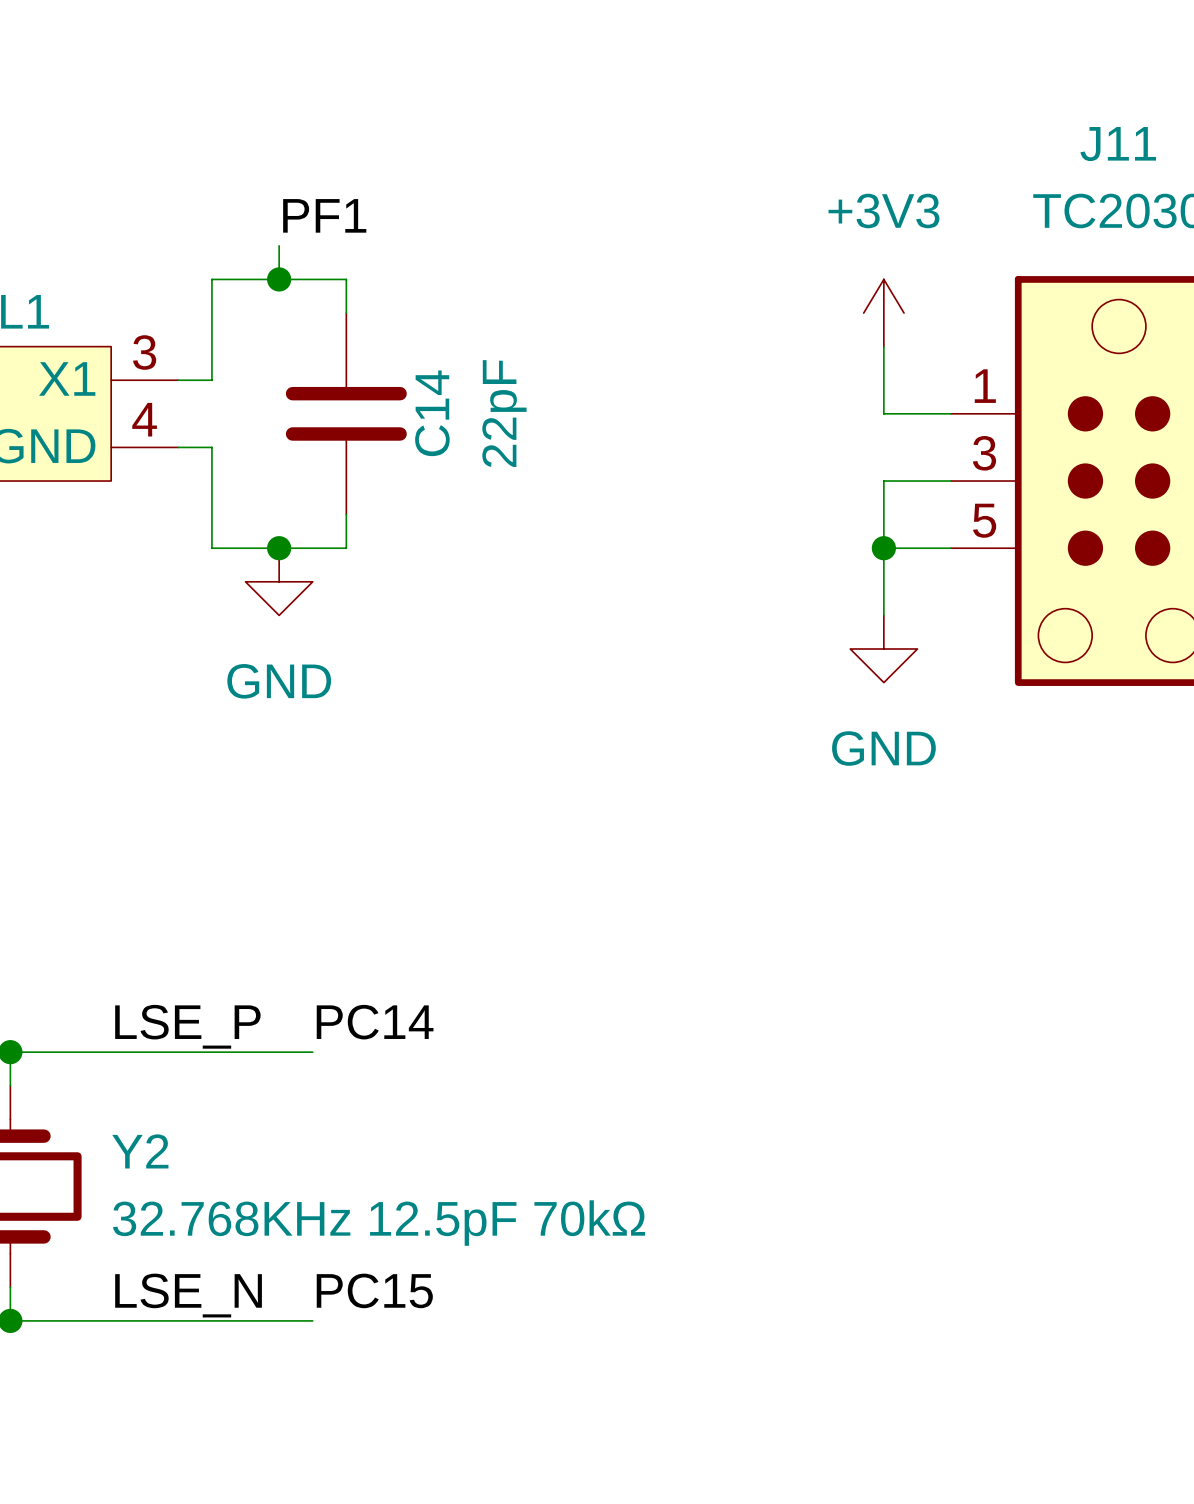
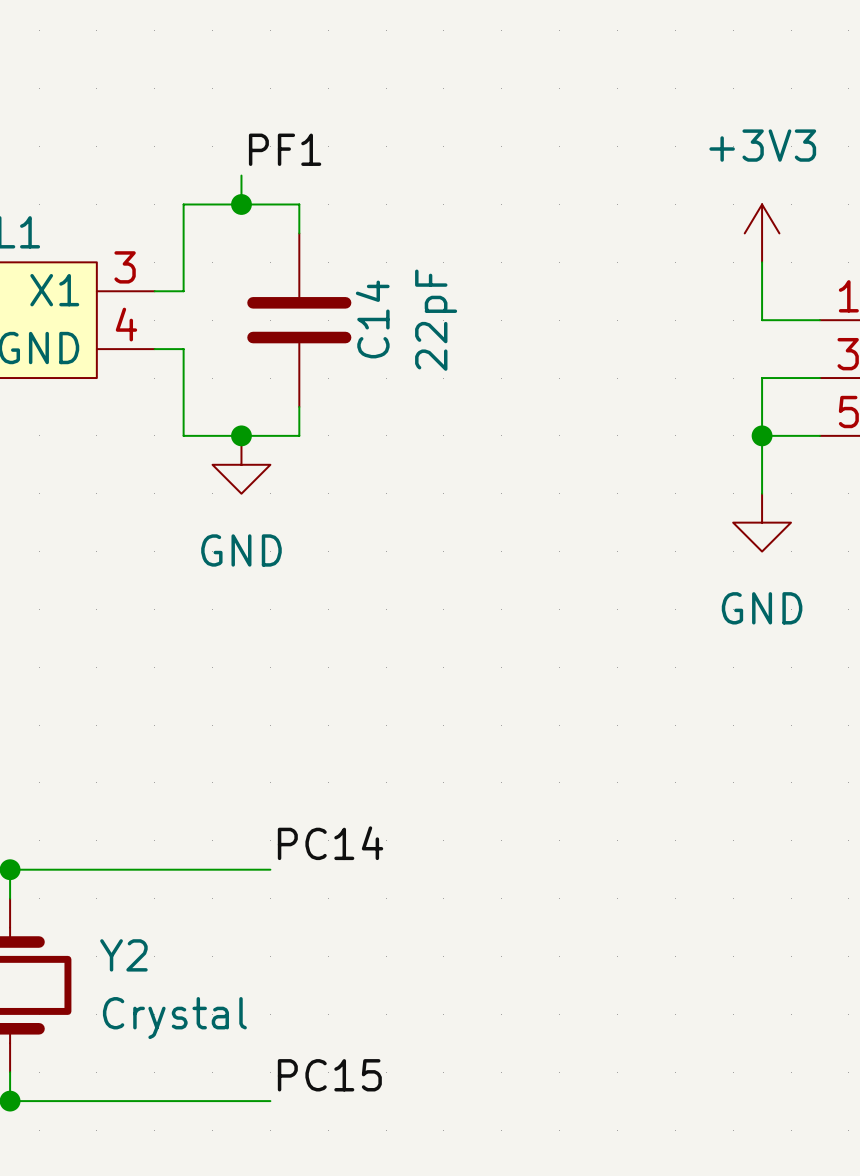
label: LSE_P (187, 1026) -> none
Y2 value: 32.768KHz 12.5pF 70kΩ (379, 1223) -> Crystal (174, 1018)
label: LSE_N (188, 1295) -> none

